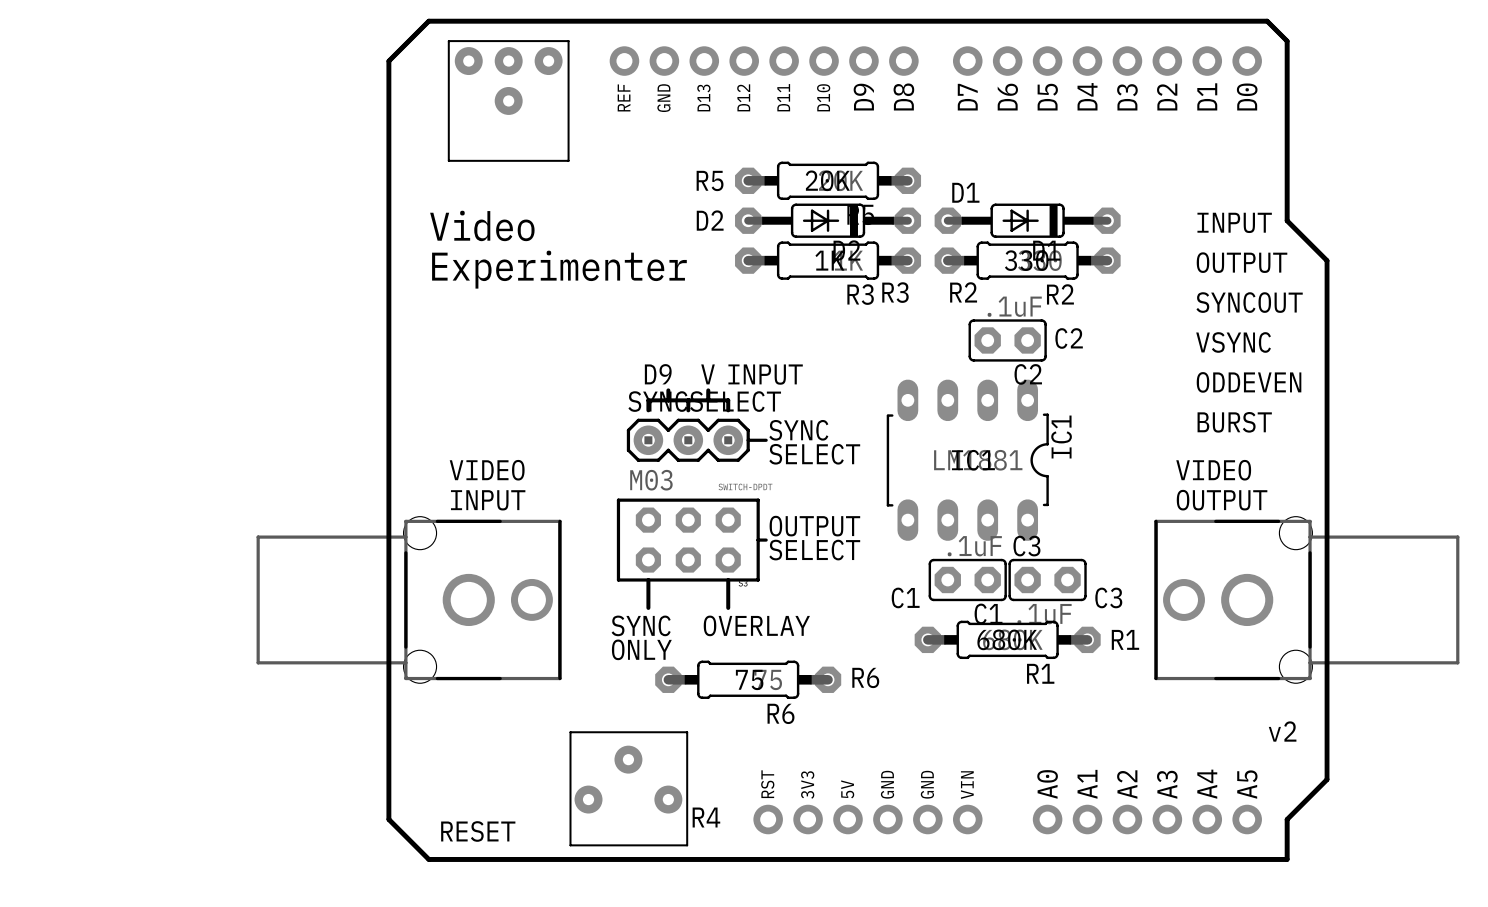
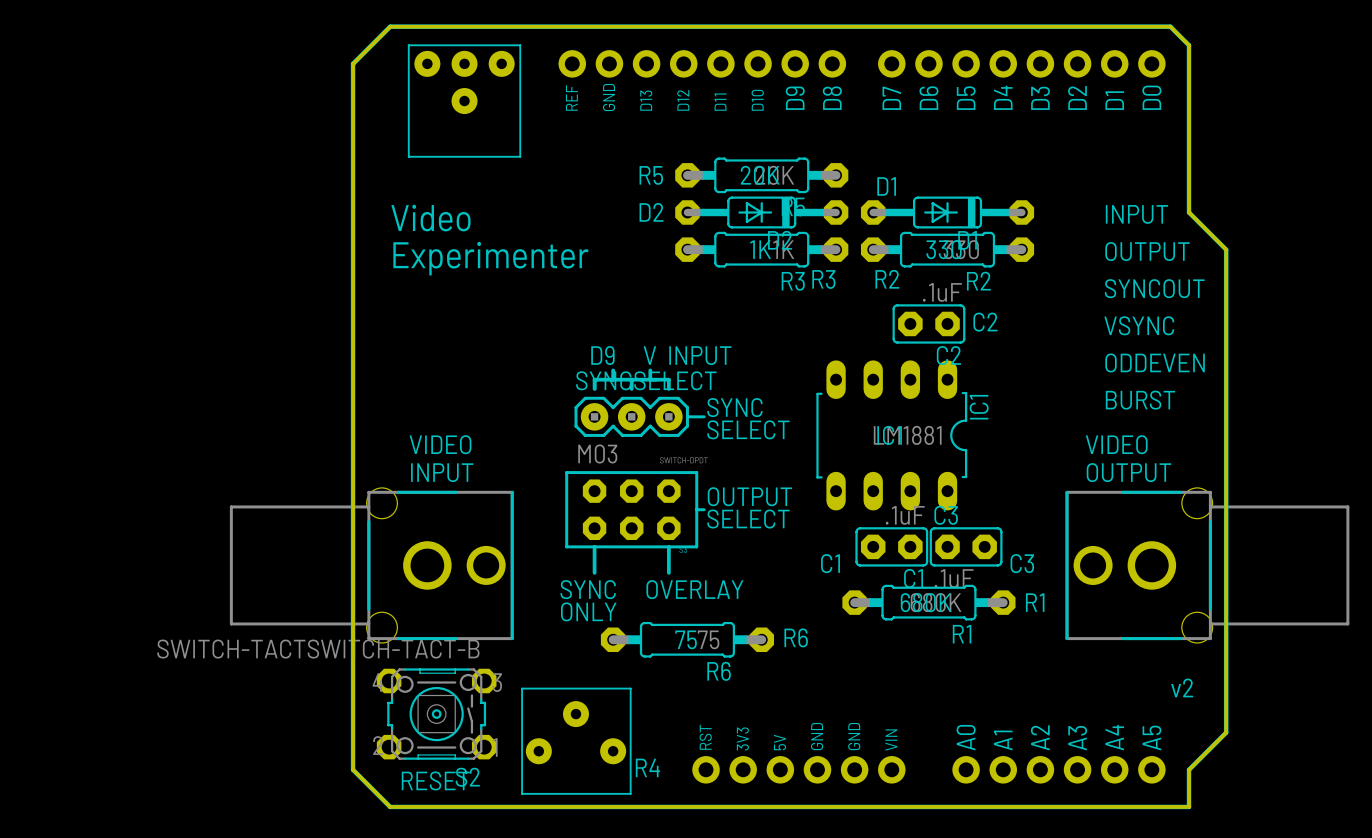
S2: none -> SWITCH-TACTSWITCH-TACT-B (436, 714)

